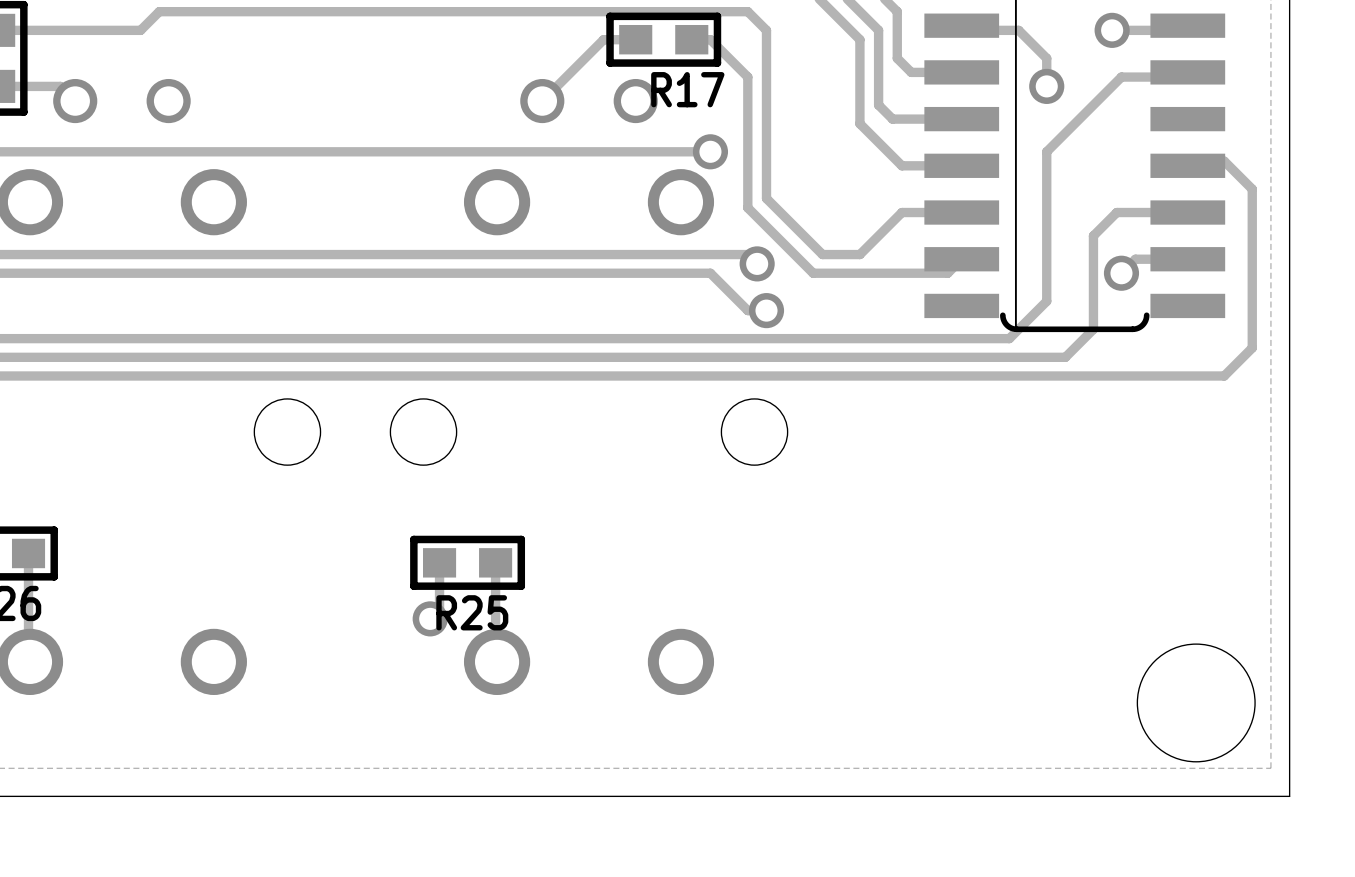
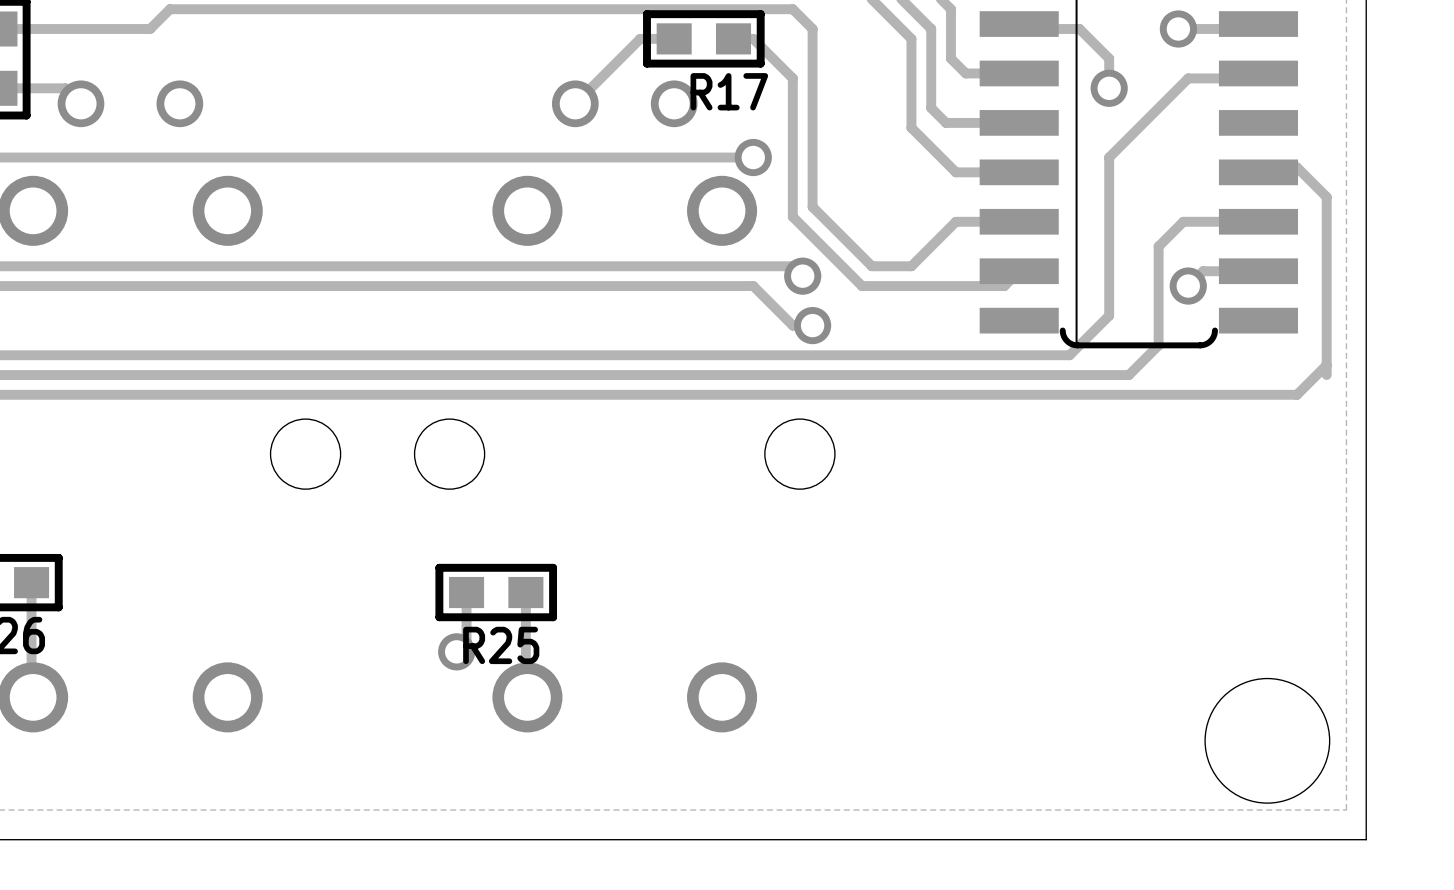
track: none -> (1326, 365) (1326, 375)

